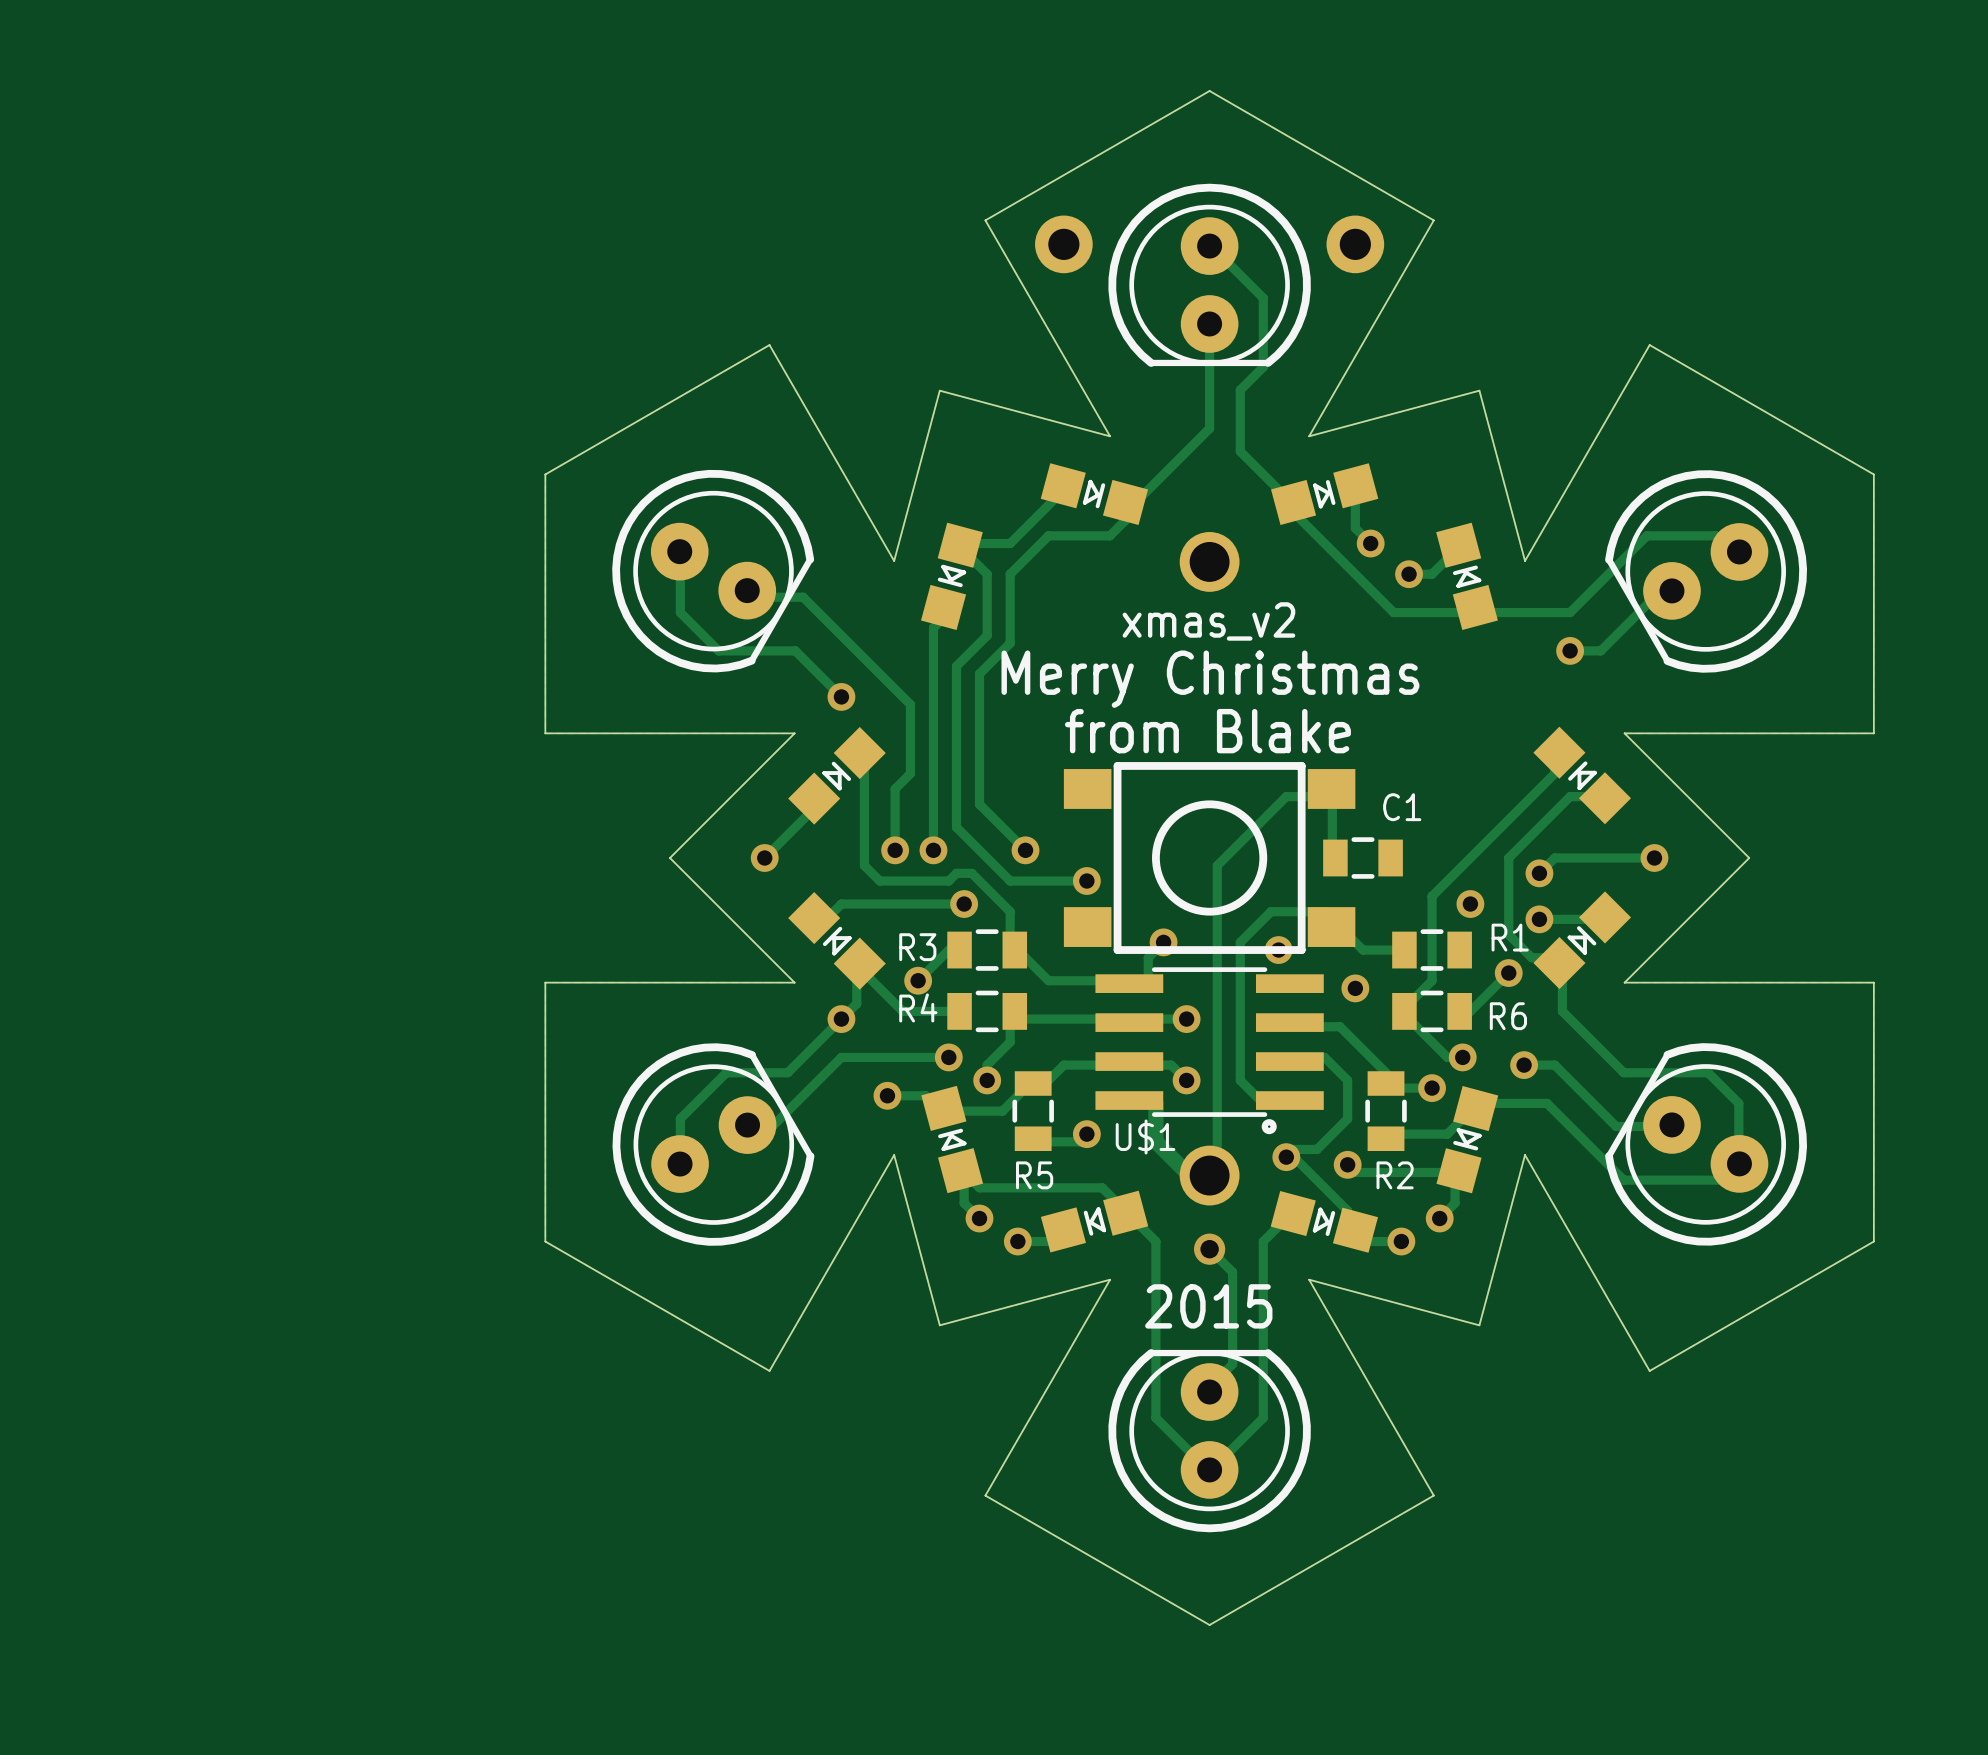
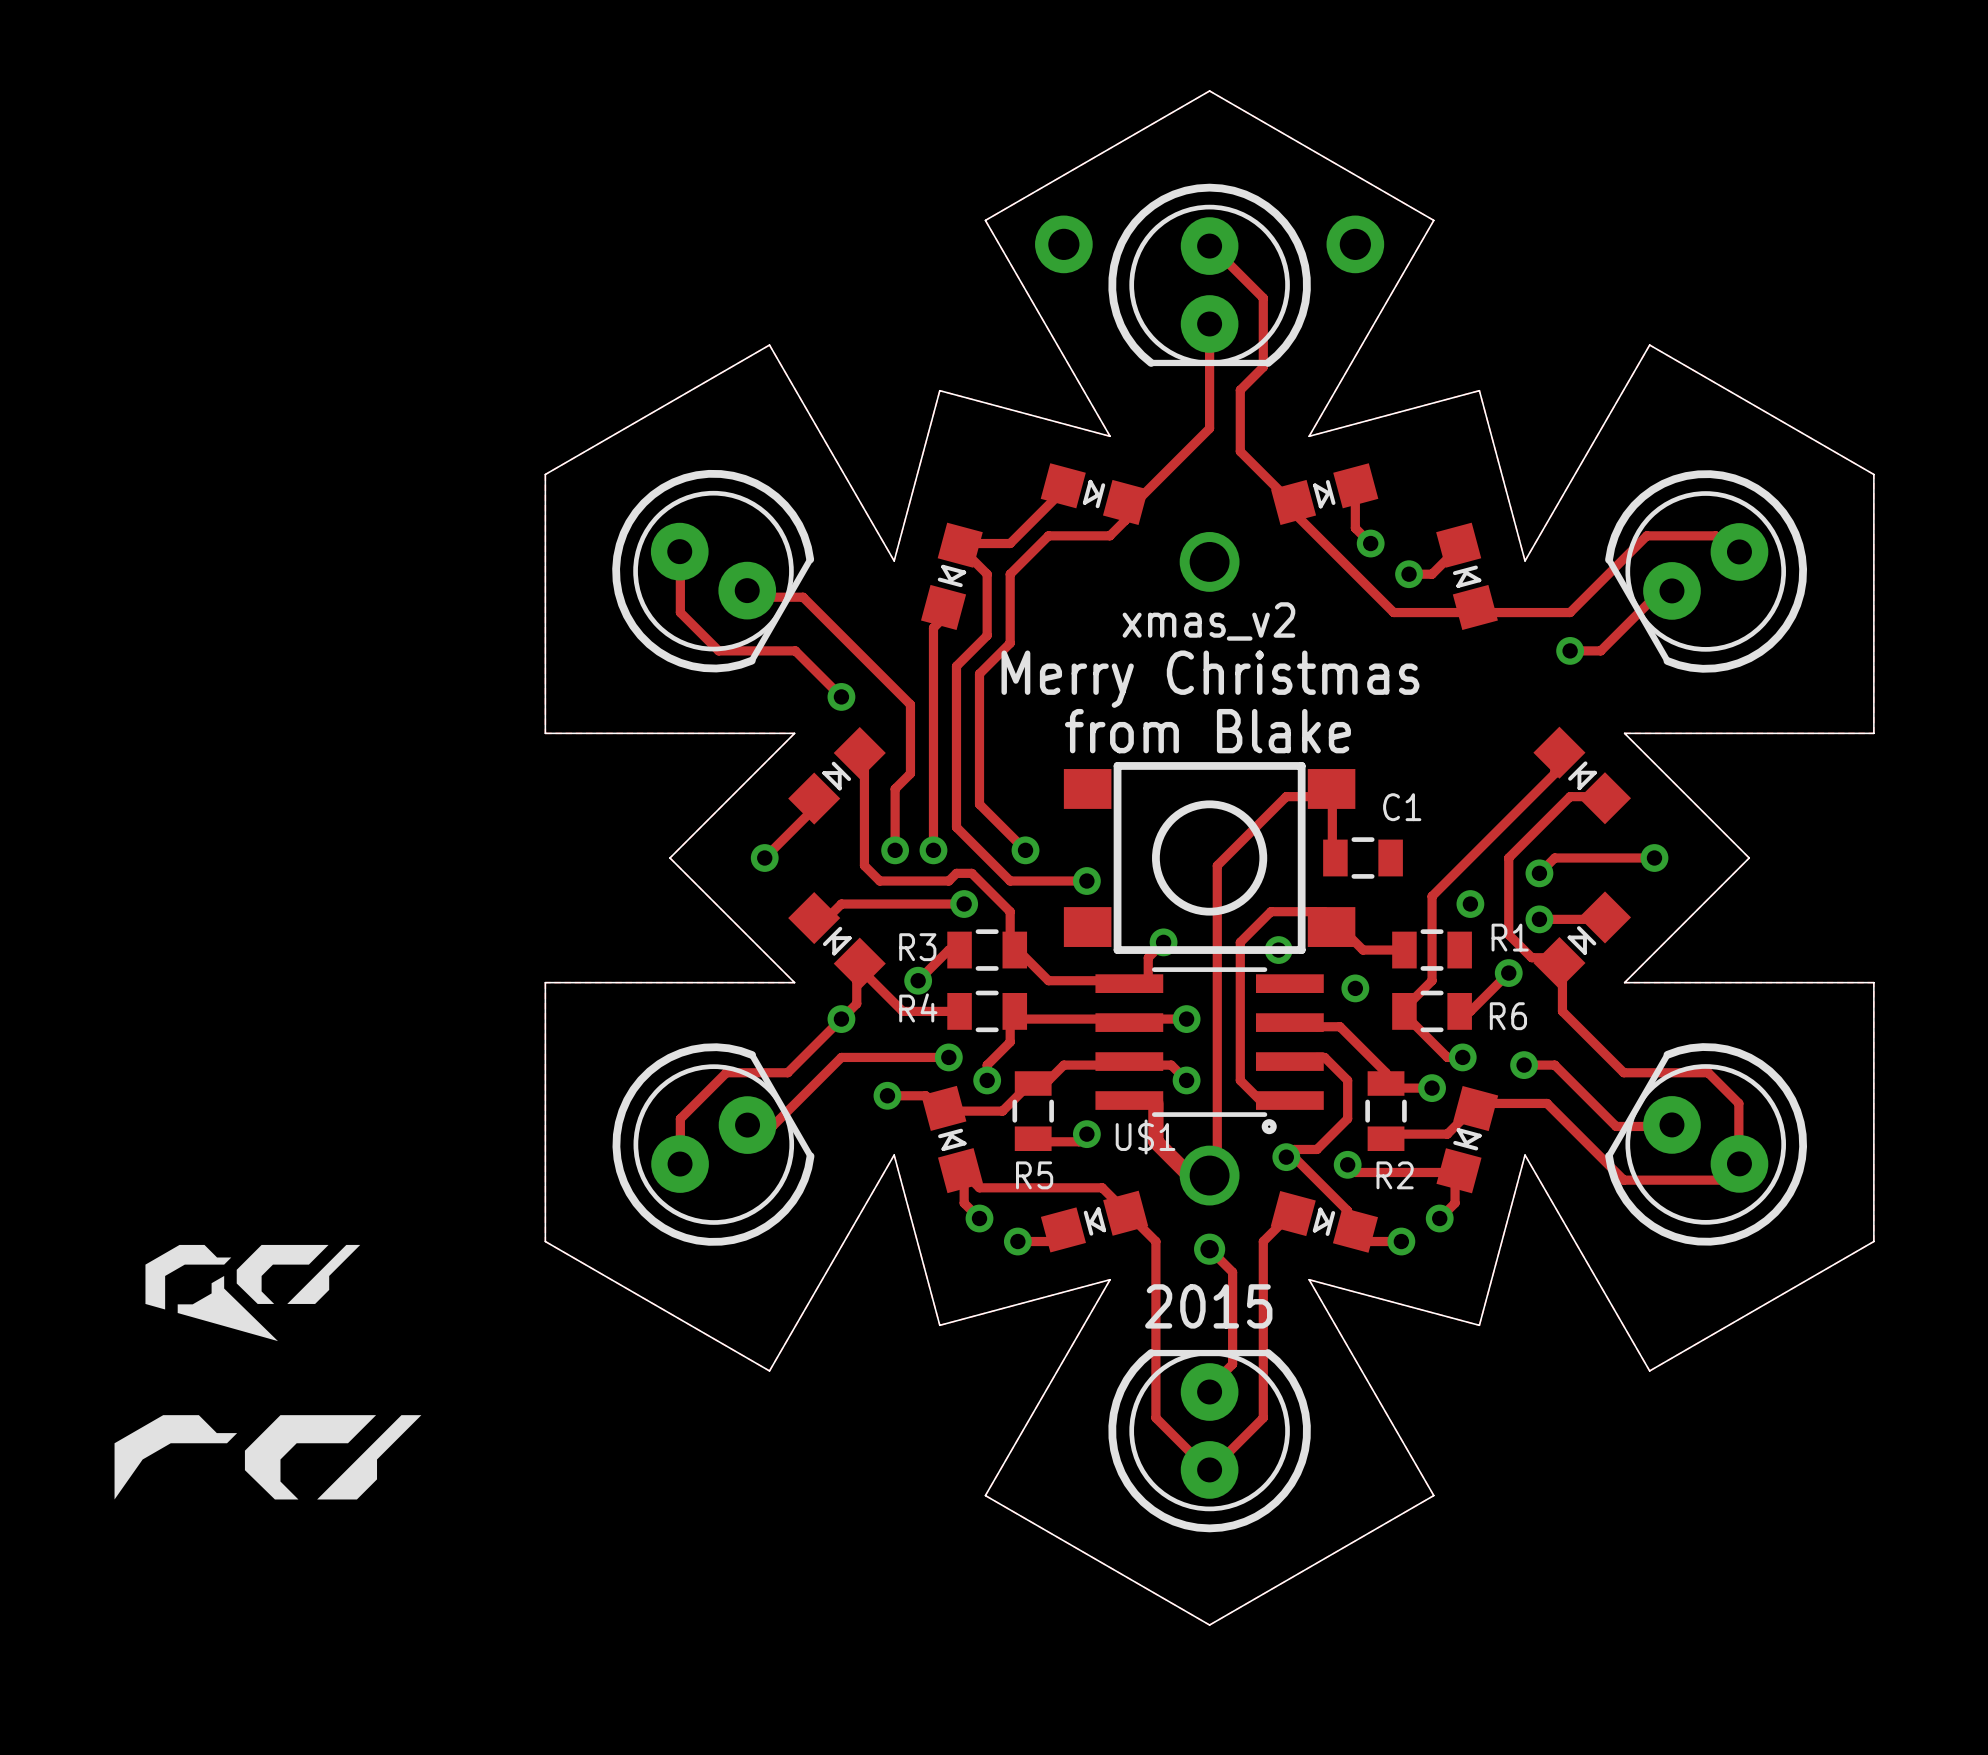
drawing: none -> [145, 1244, 361, 1342]
drawing: none -> [114, 1415, 422, 1500]

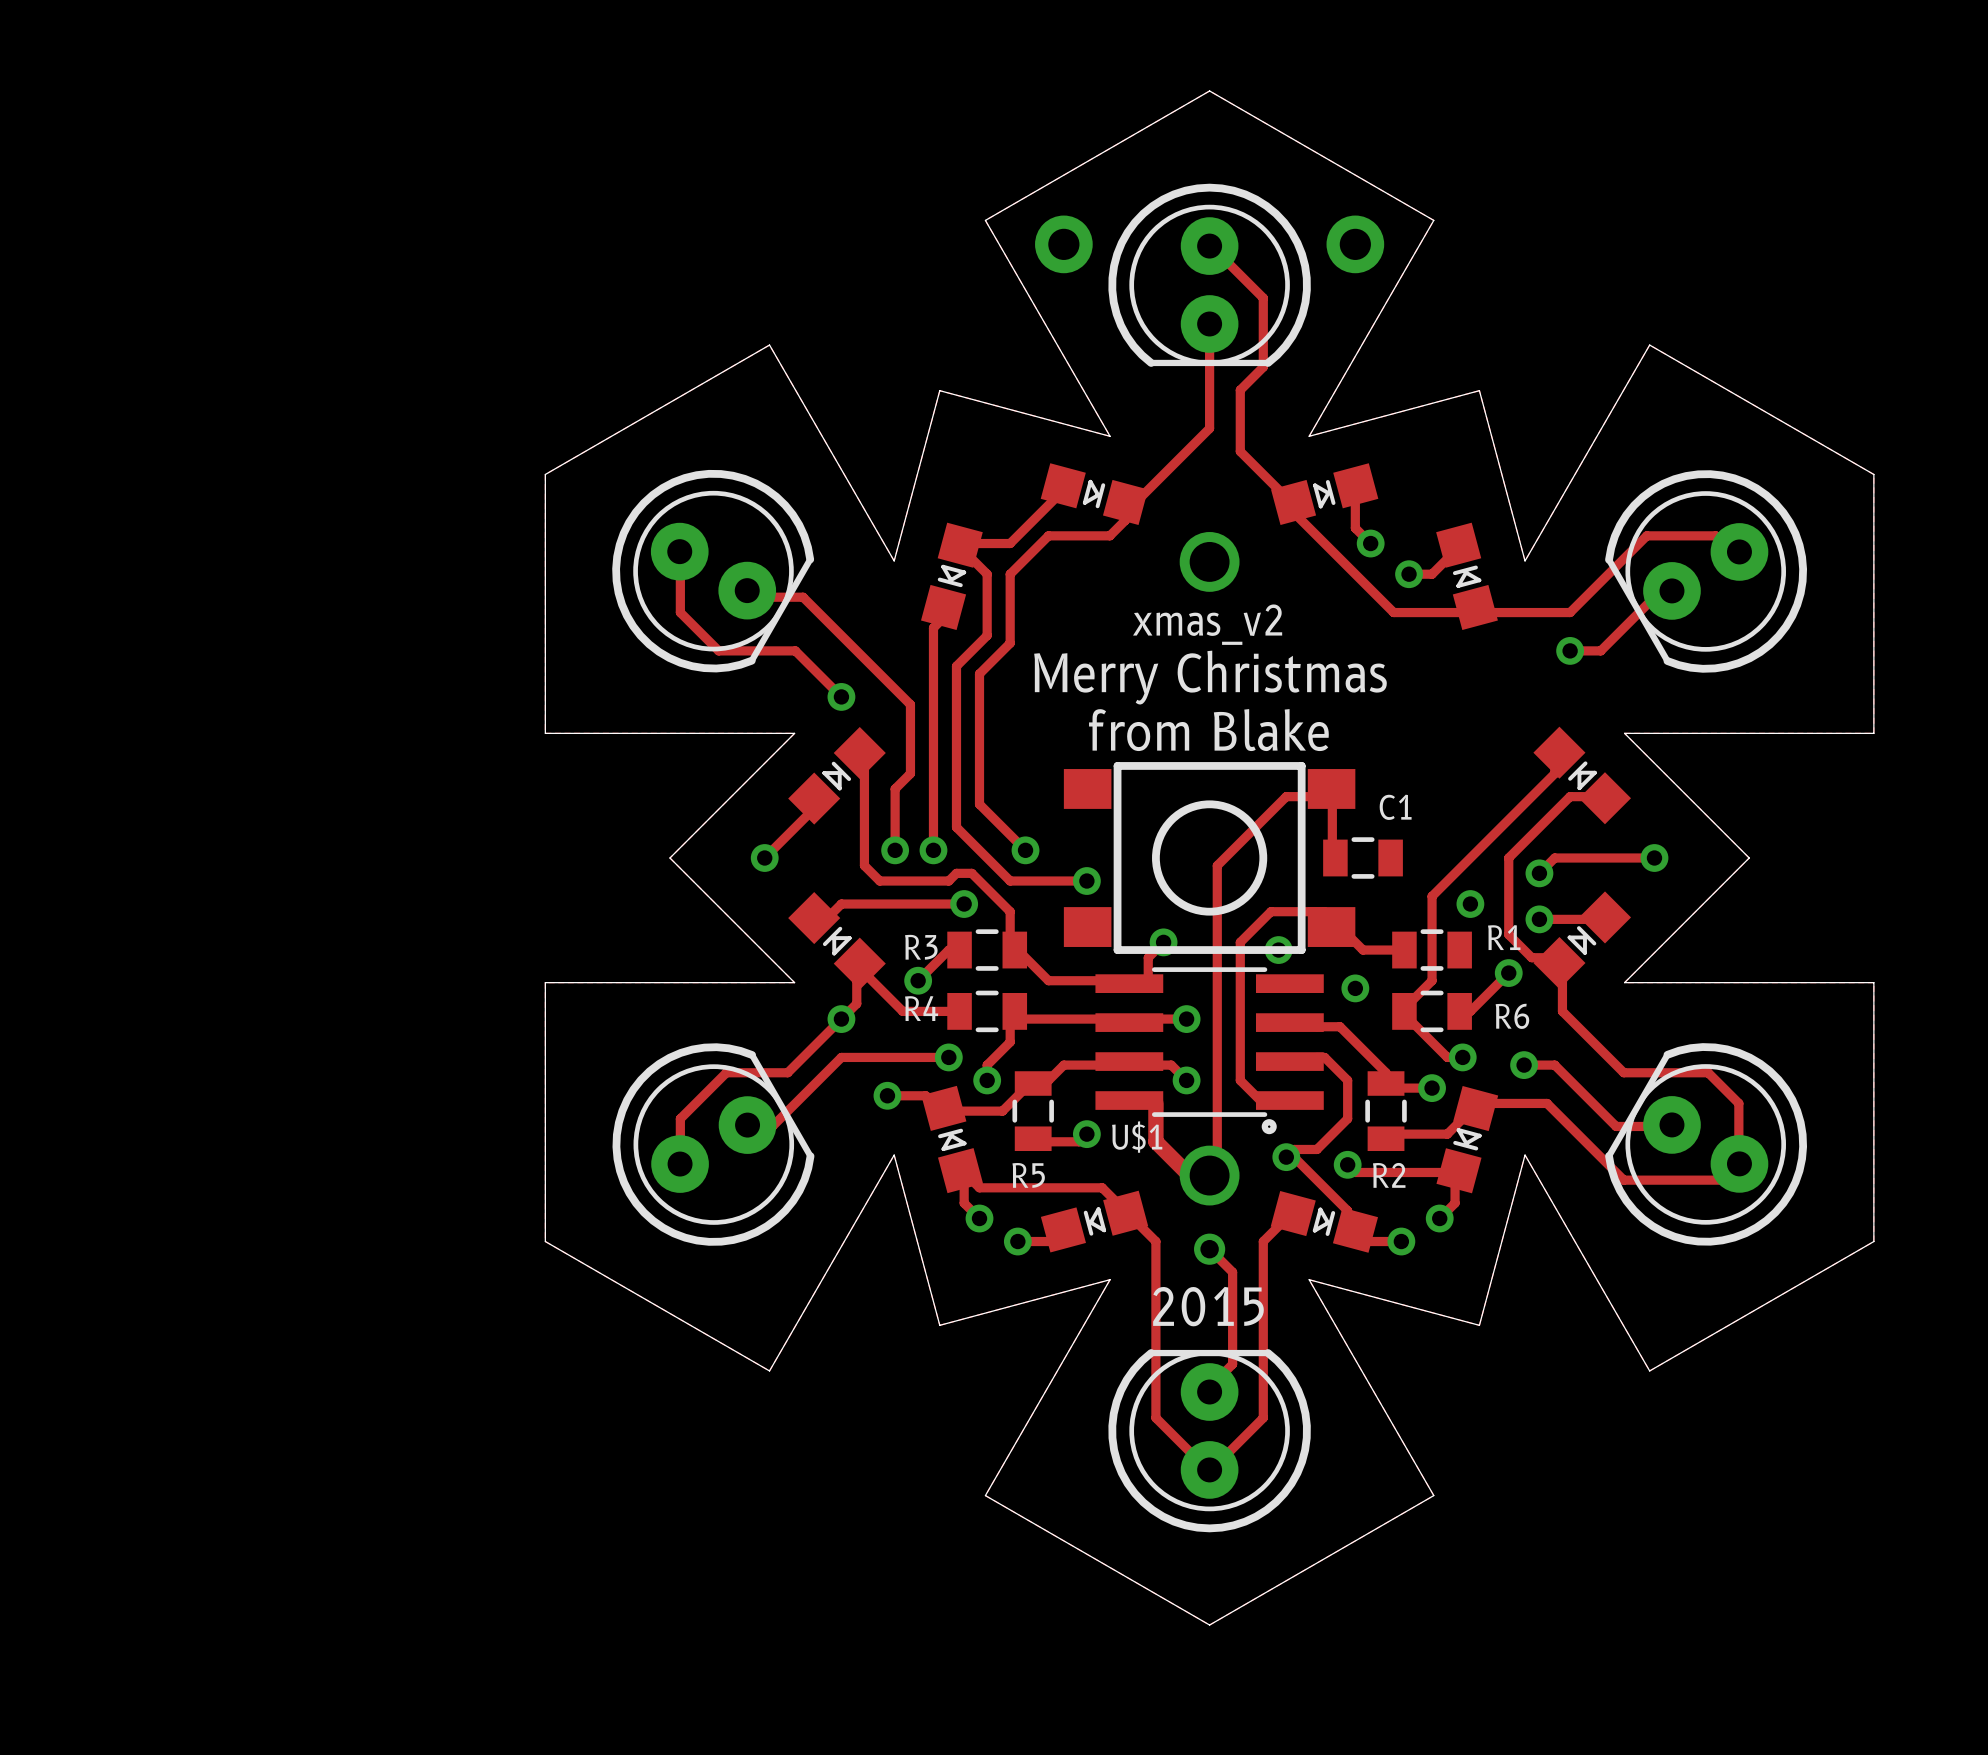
drawing: [145, 1244, 361, 1342] -> none
drawing: [114, 1415, 422, 1500] -> none

